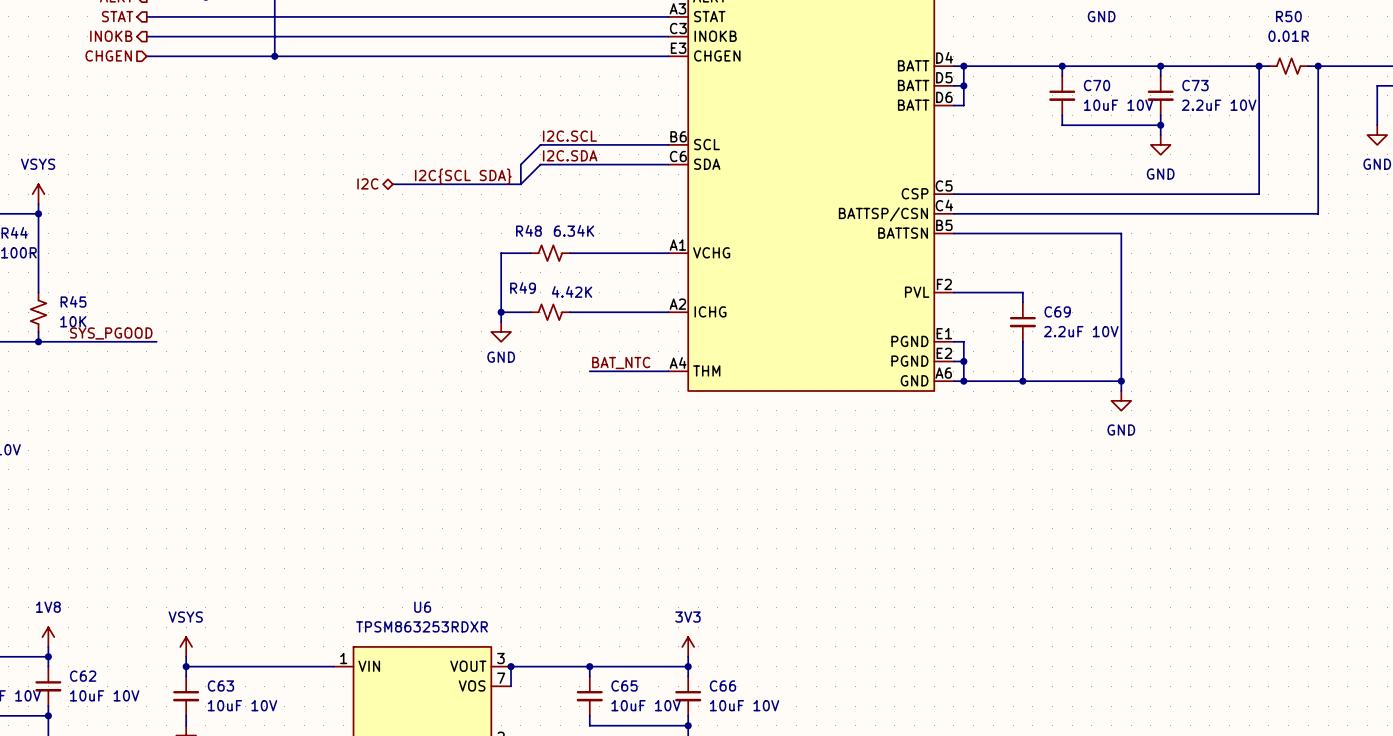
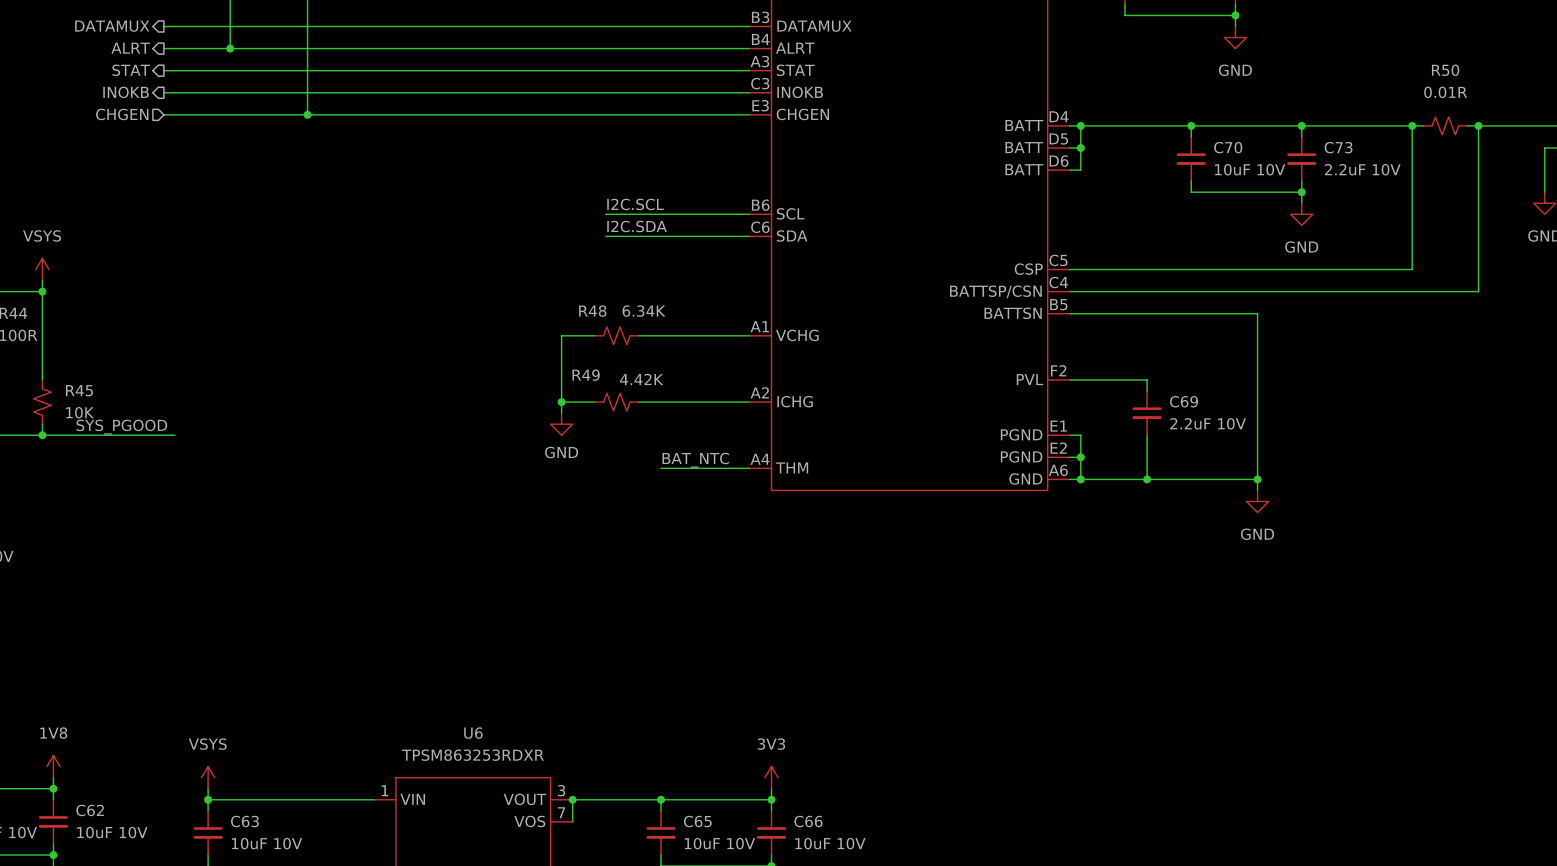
wire: (540, 144) (520, 164) -> none
bus: (520, 164) (520, 184) (392, 184) -> none
wire: (540, 164) (520, 184) -> none
label: I2C{SCL SDA} (463, 176) -> none
hierarchical label: I2C (367, 183) -> none

